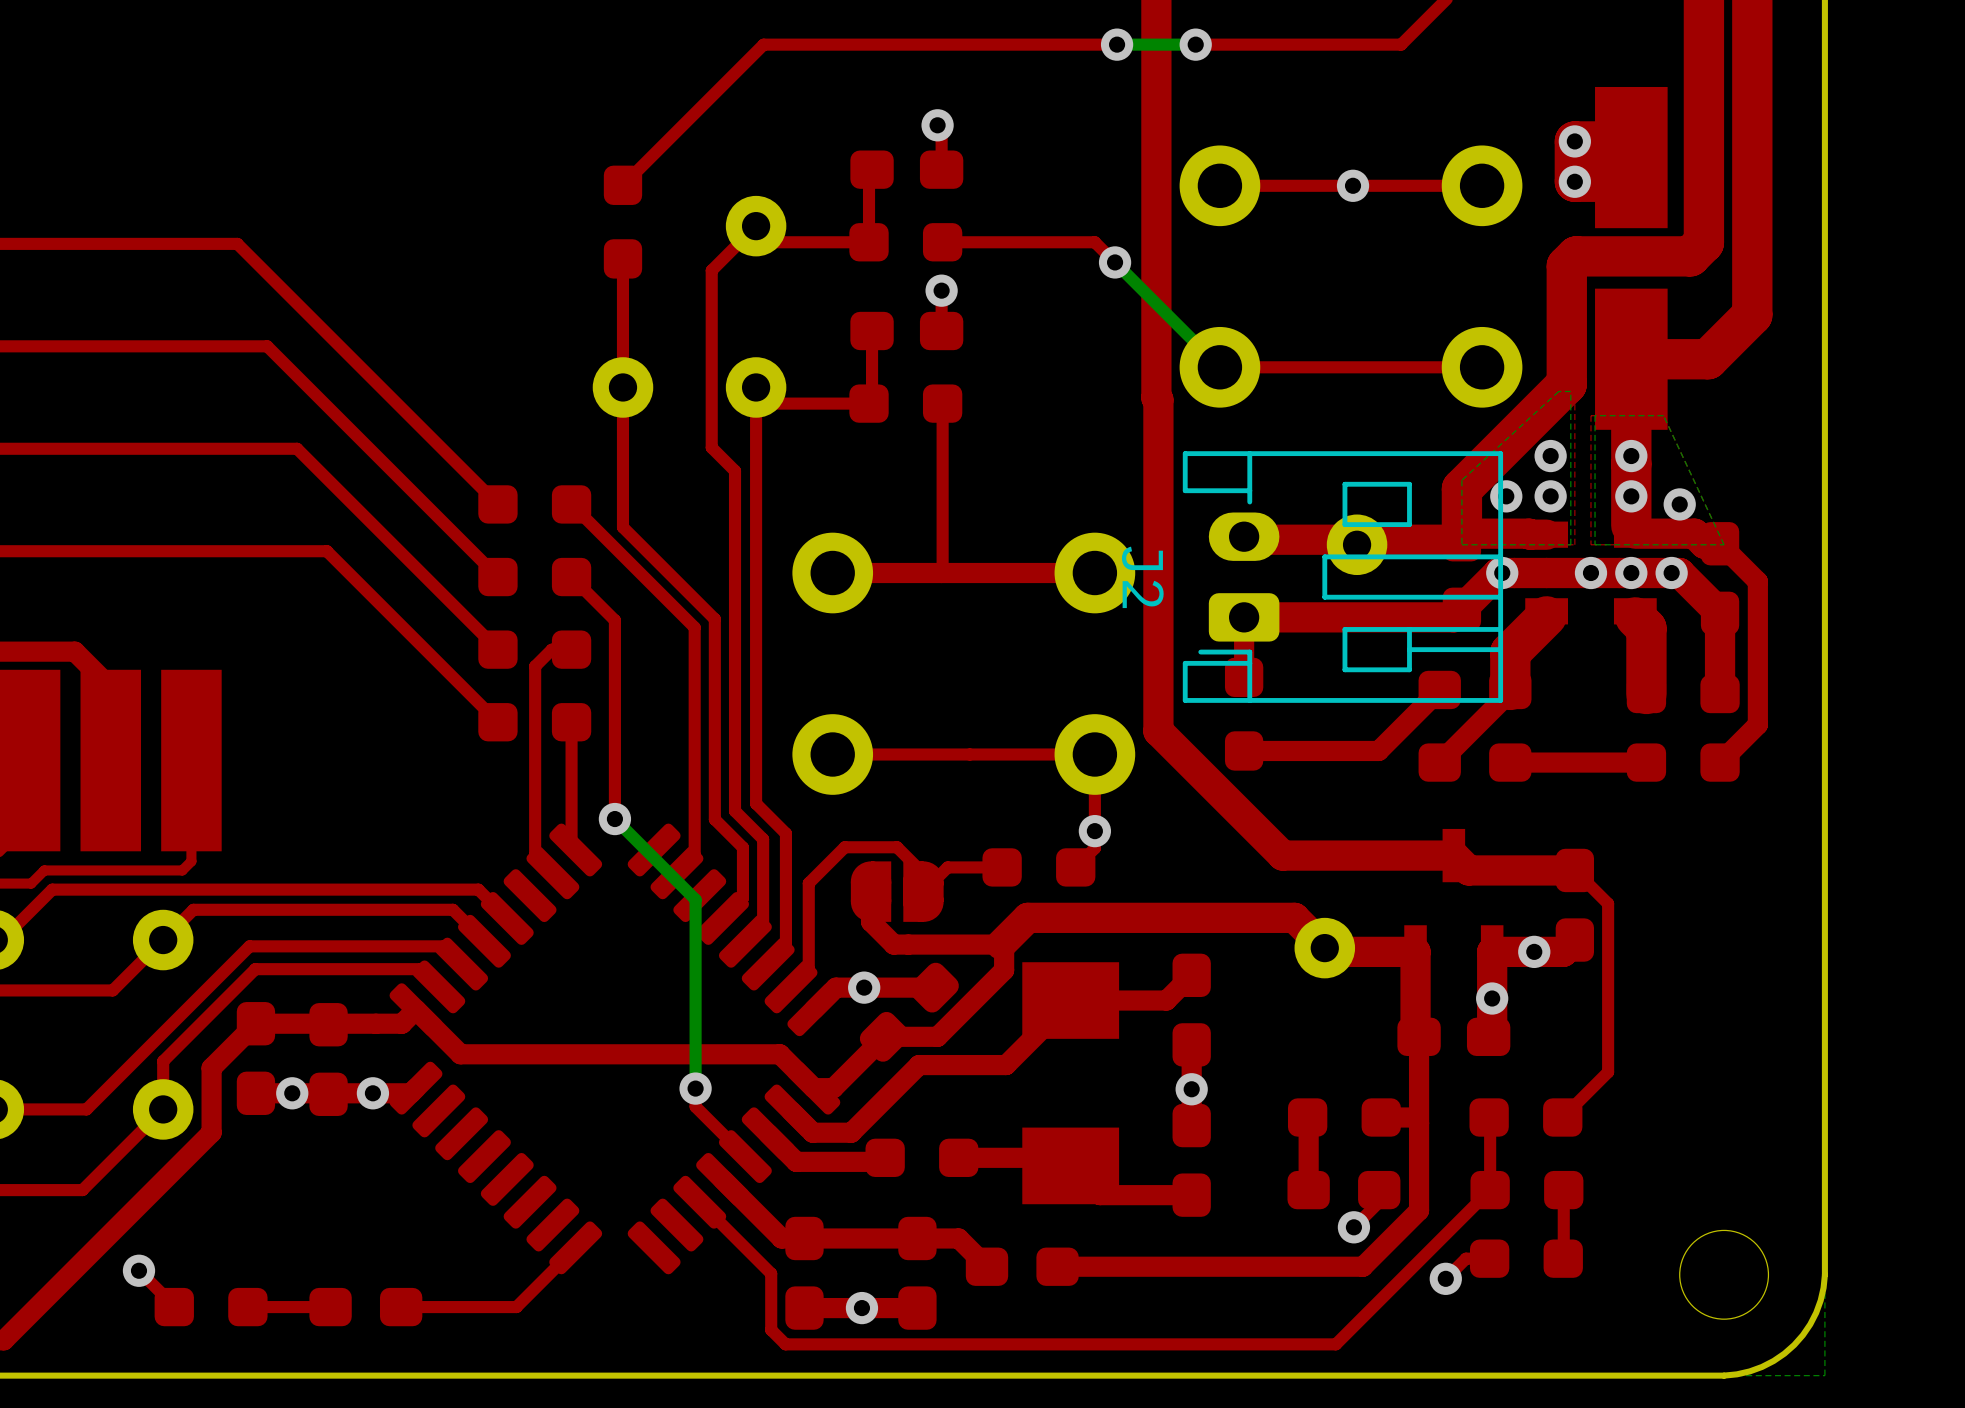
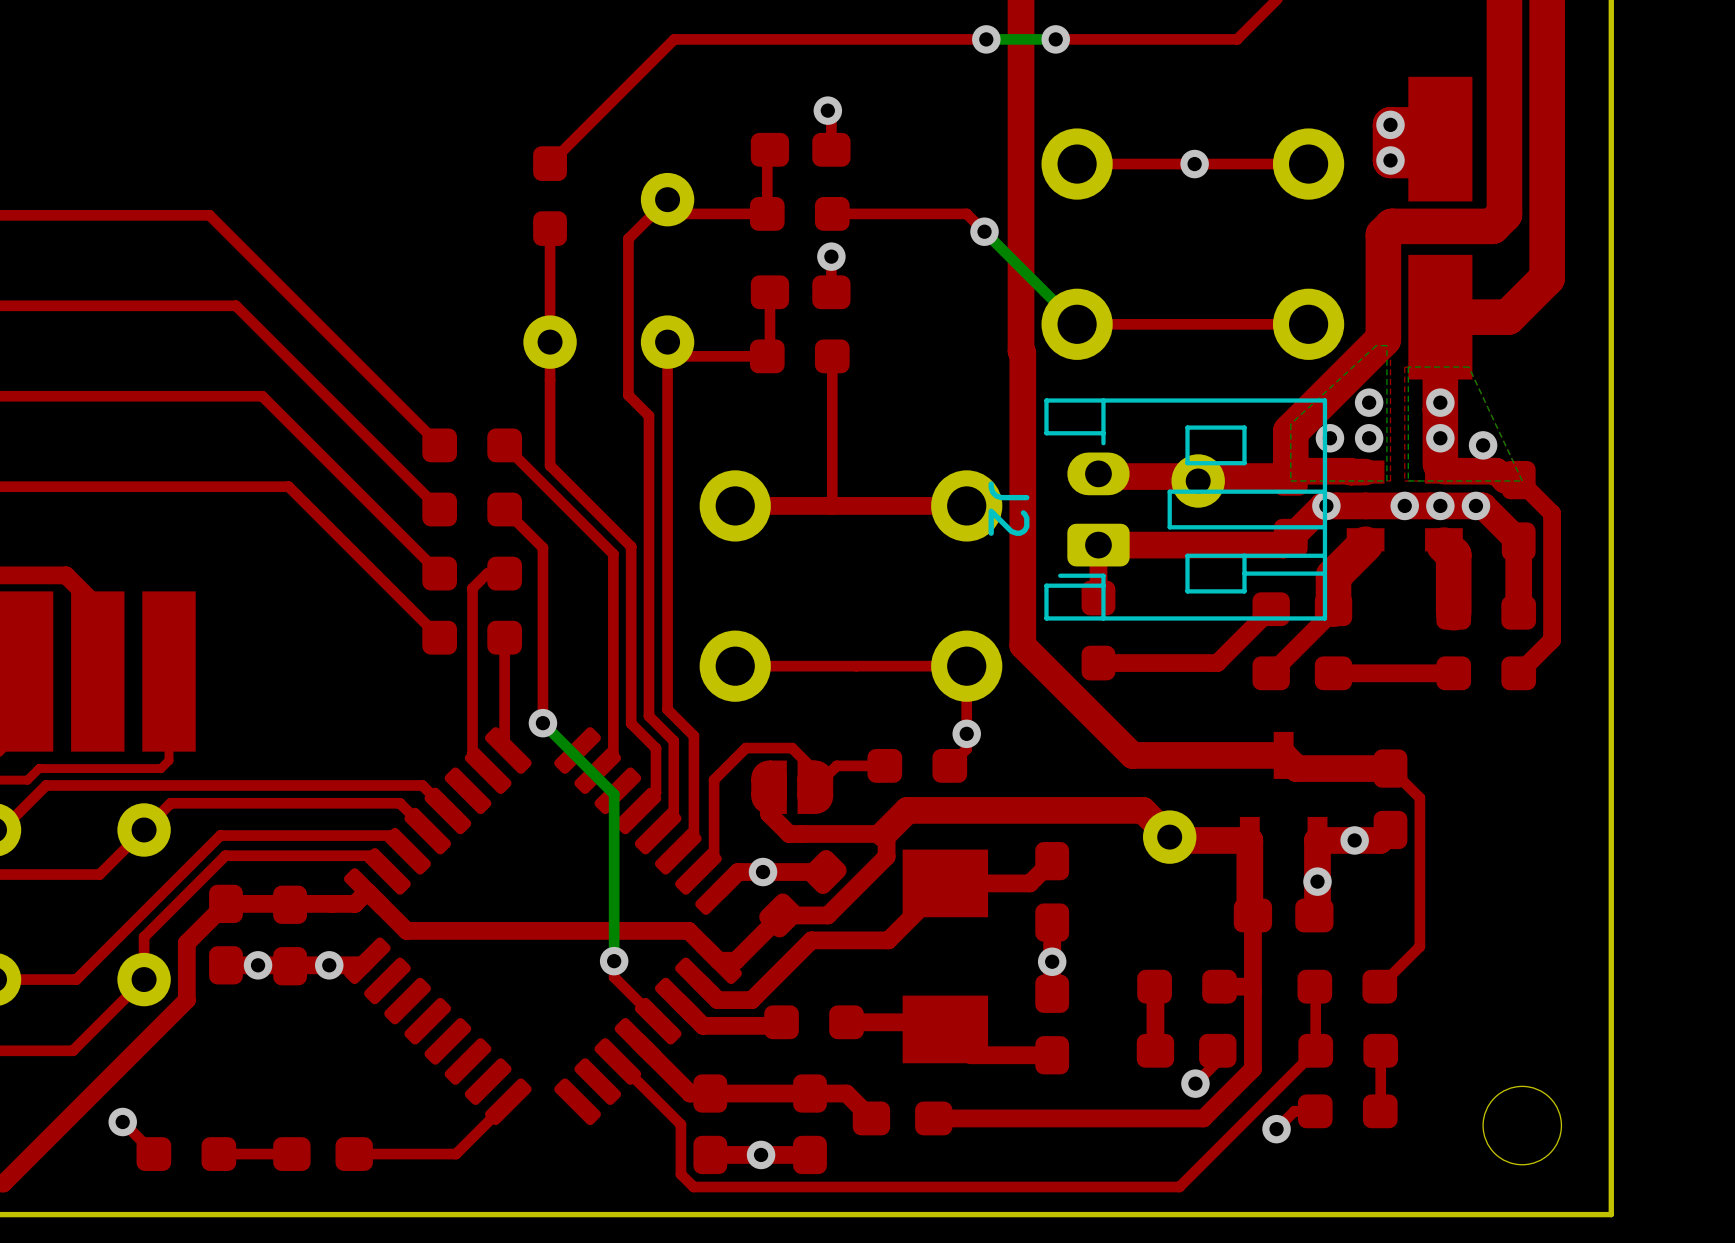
board edge: (1824, 1274) (1823, 1287) (1816, 1312) (1802, 1335) (1794, 1344) (1773, 1360) (1762, 1366) (1737, 1374) (1724, 1375) -> (1611, 1125) (1611, 1214) (1522, 1214)

